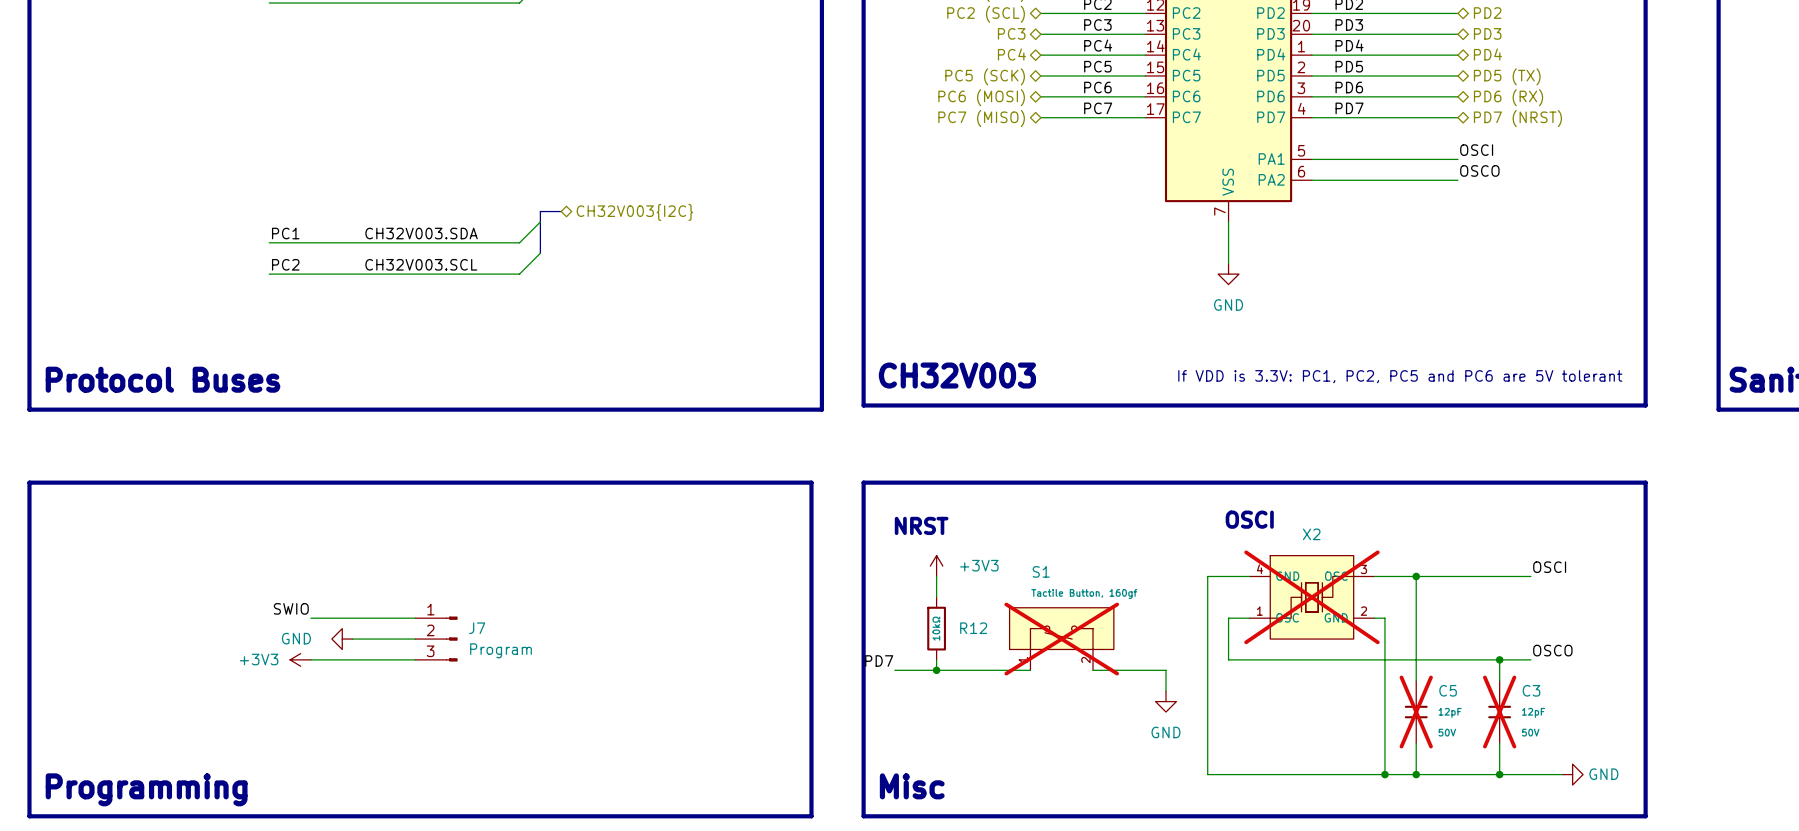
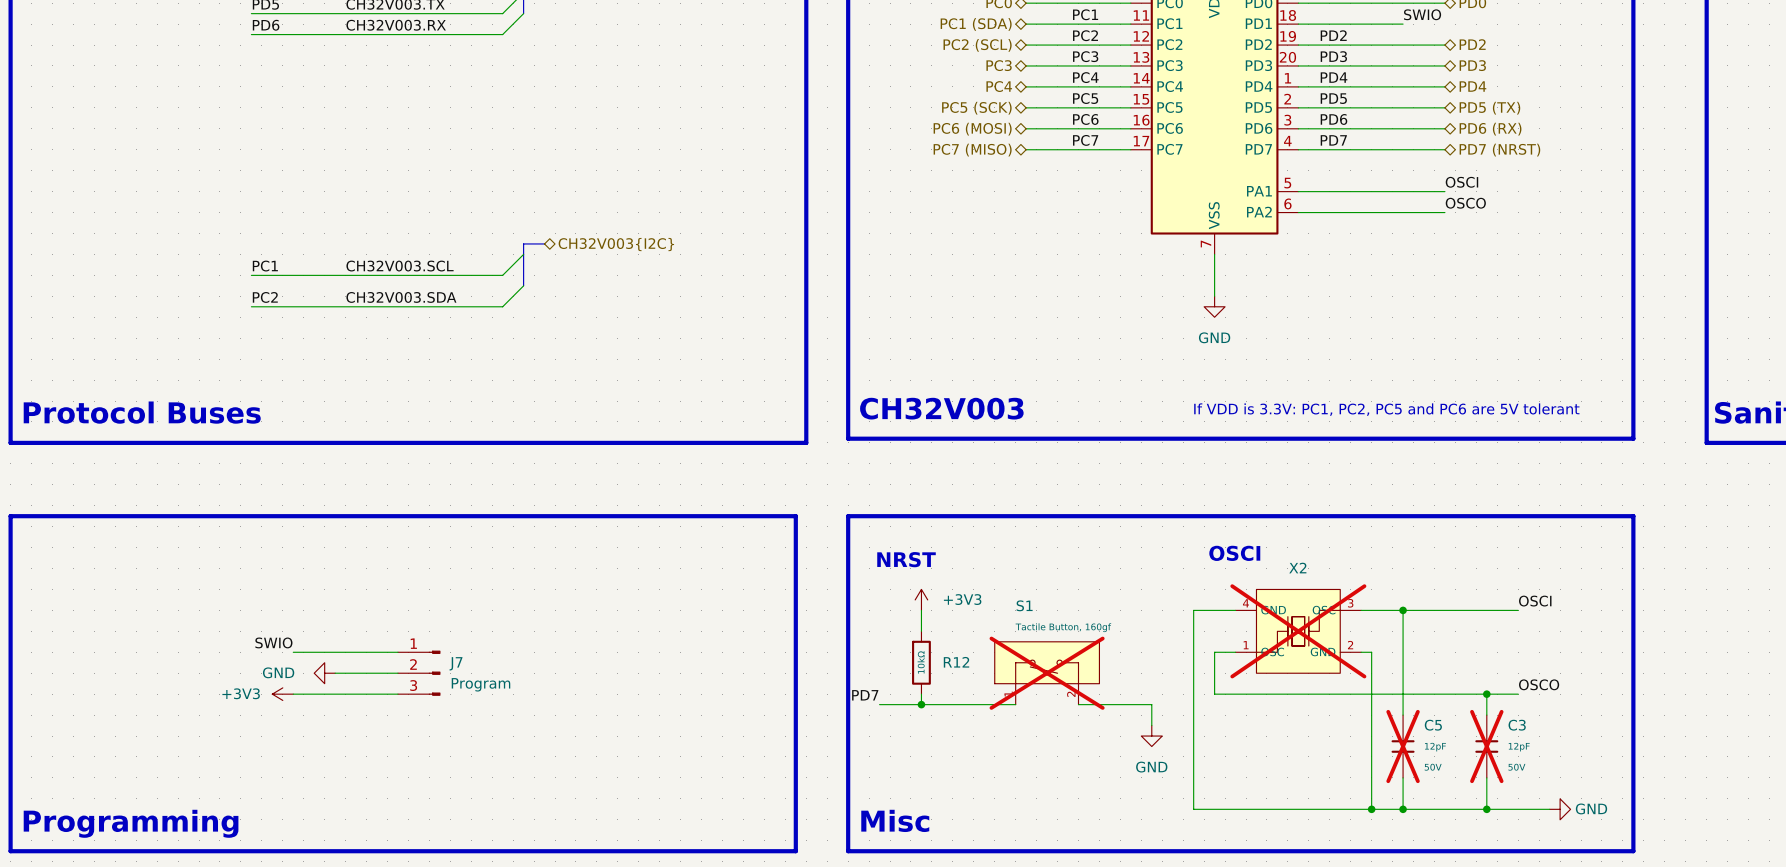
label: CH32V003.SDA (421, 233) -> CH32V003.SCL (400, 266)
label: CH32V003.SCL (421, 264) -> CH32V003.SDA (401, 297)

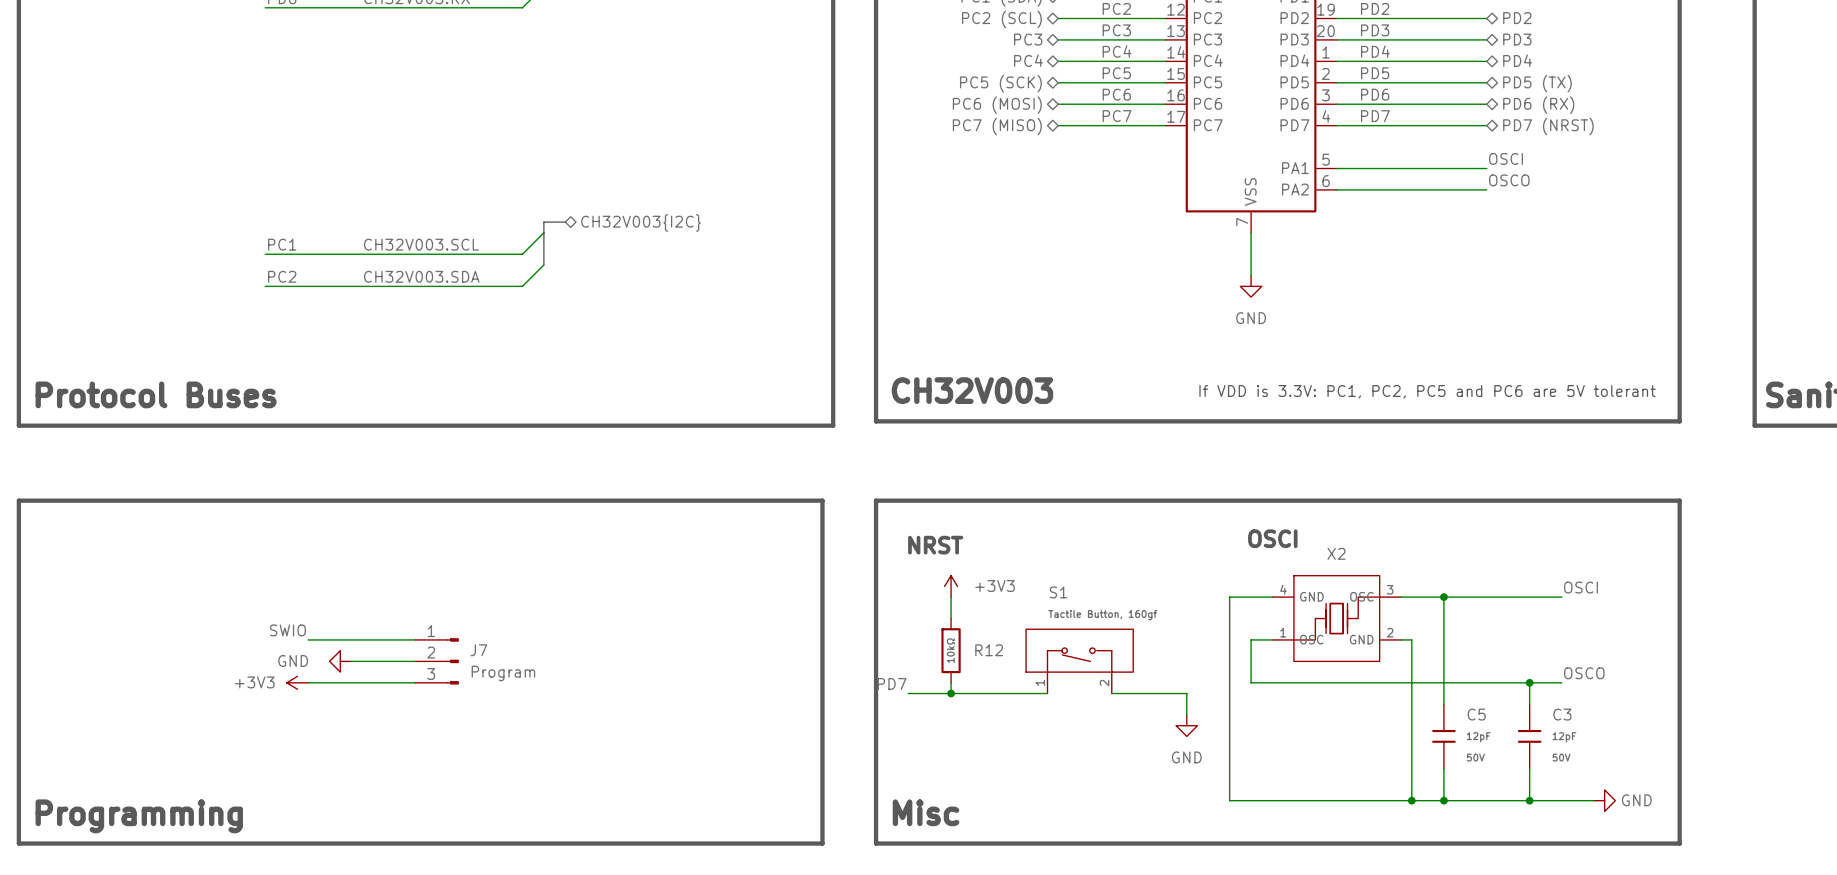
X2 do-not-place cross: (1298, 631) -> none
S1 do-not-place cross: (1047, 673) -> none
C5 do-not-place cross: (1403, 746) -> none
C3 do-not-place cross: (1486, 746) -> none

